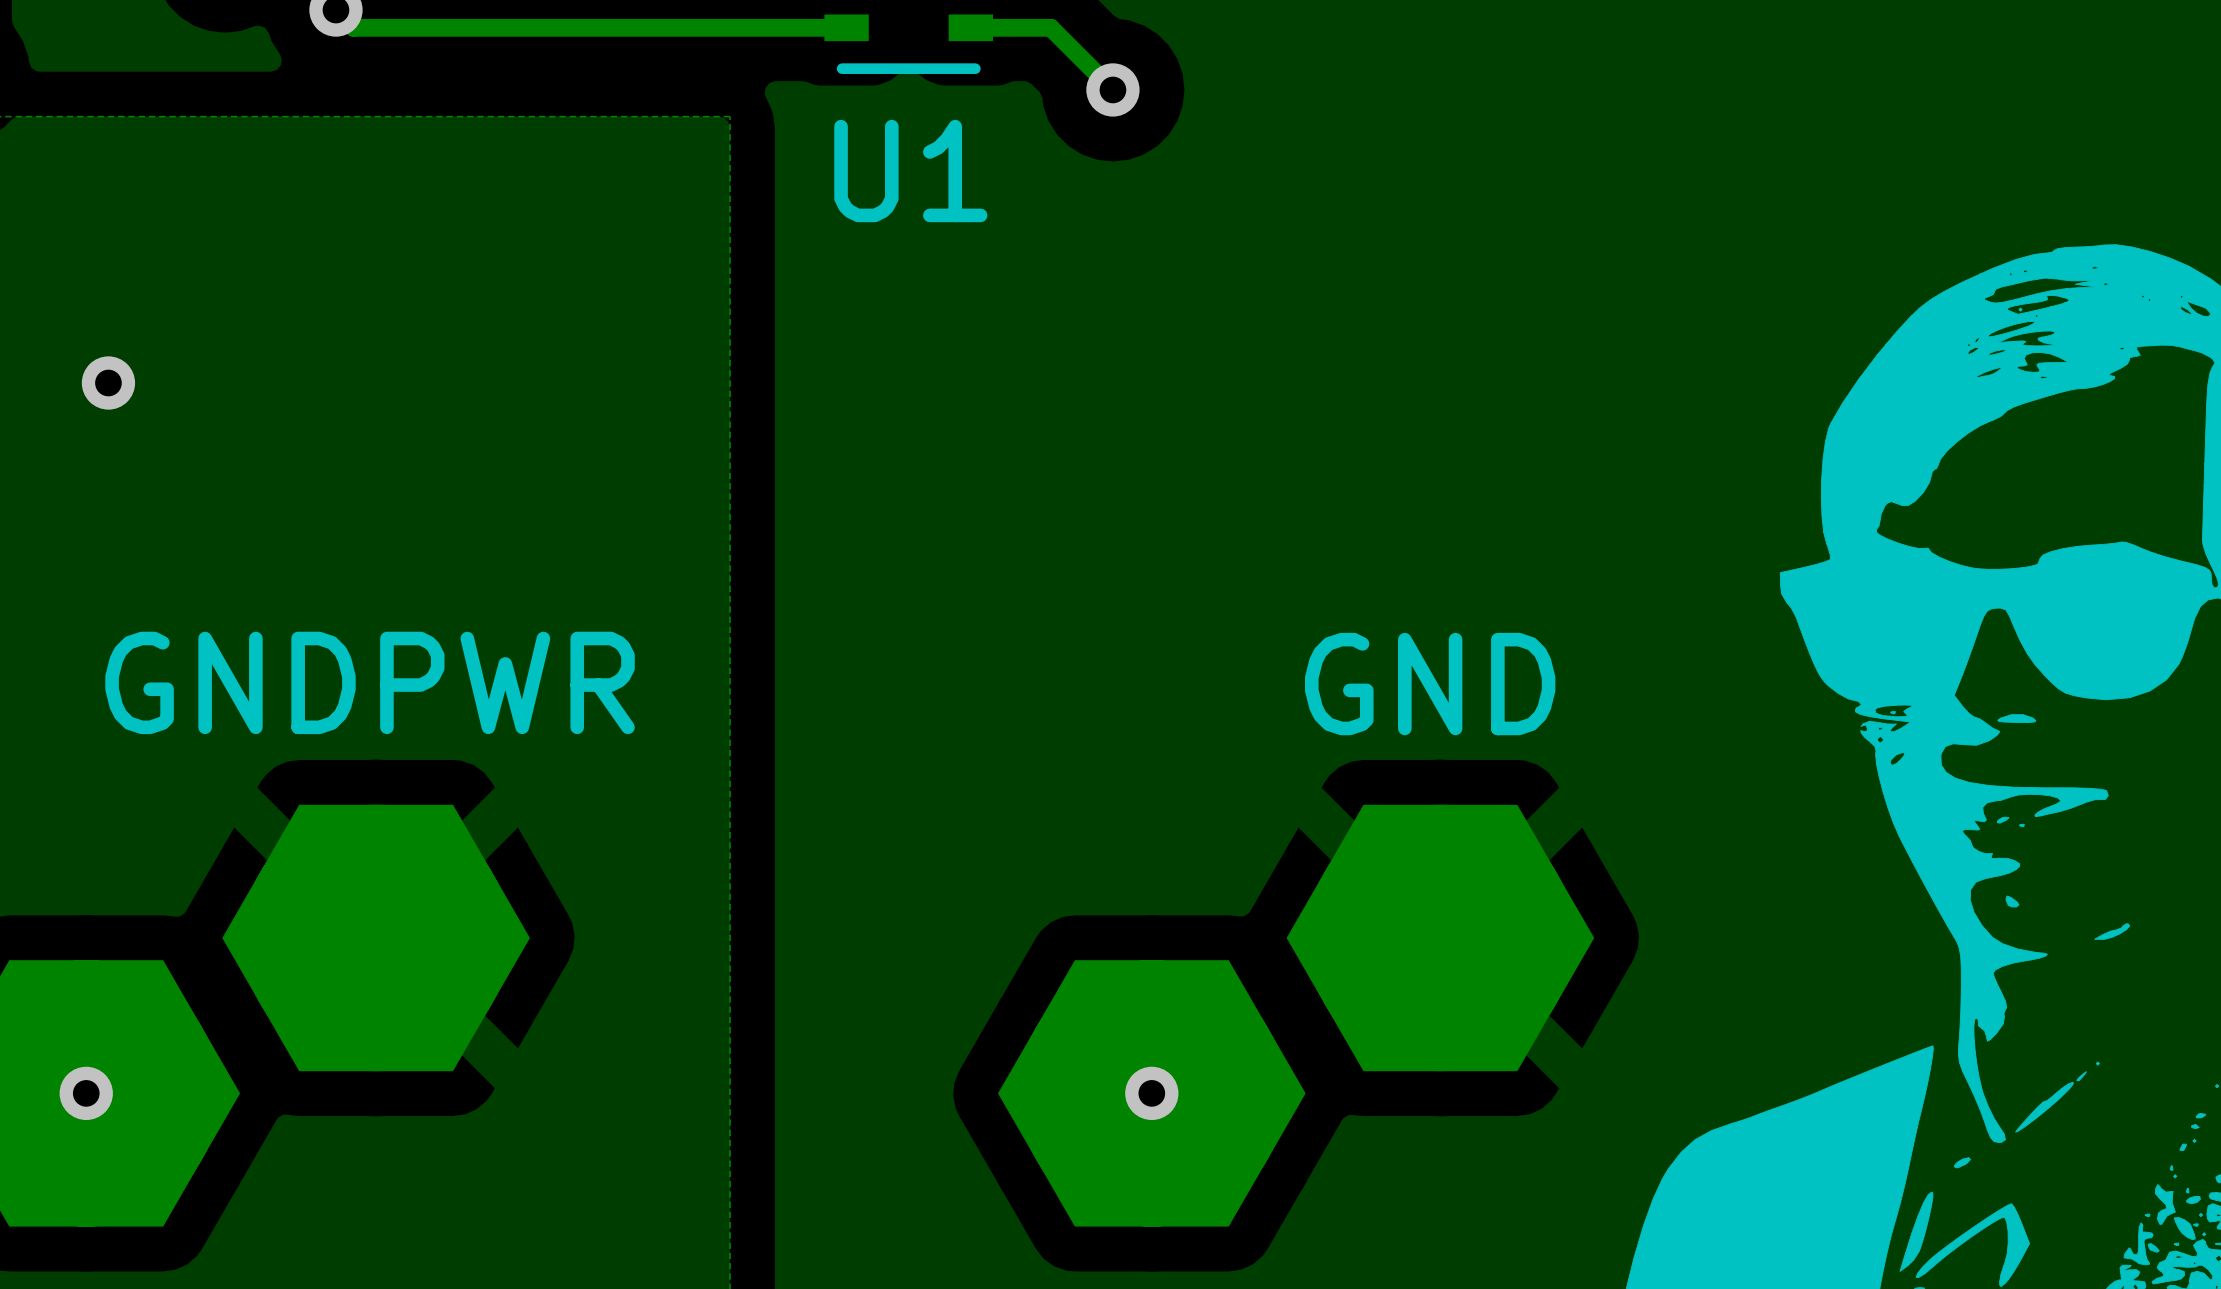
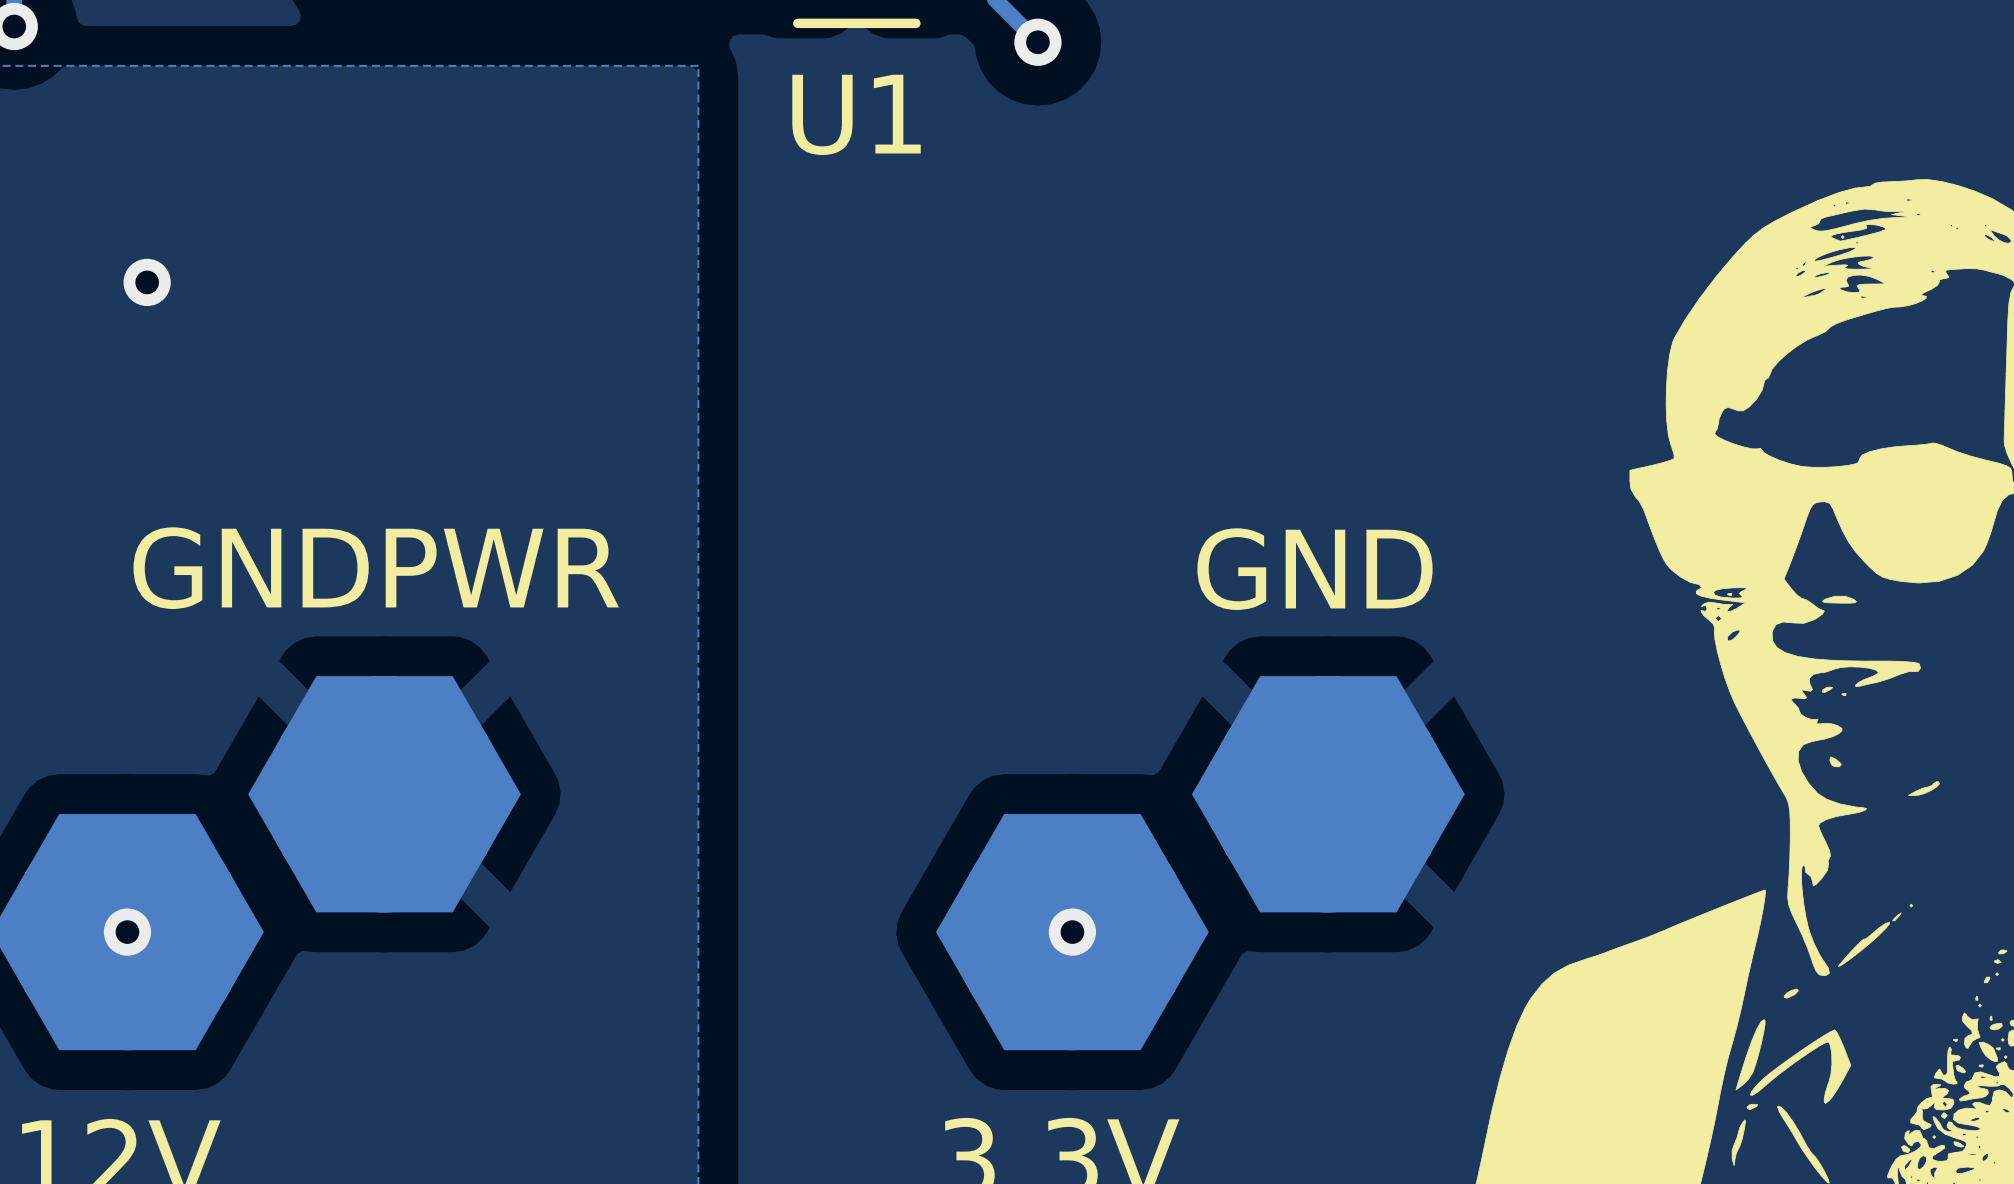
via position: (108, 383) -> (147, 282)

